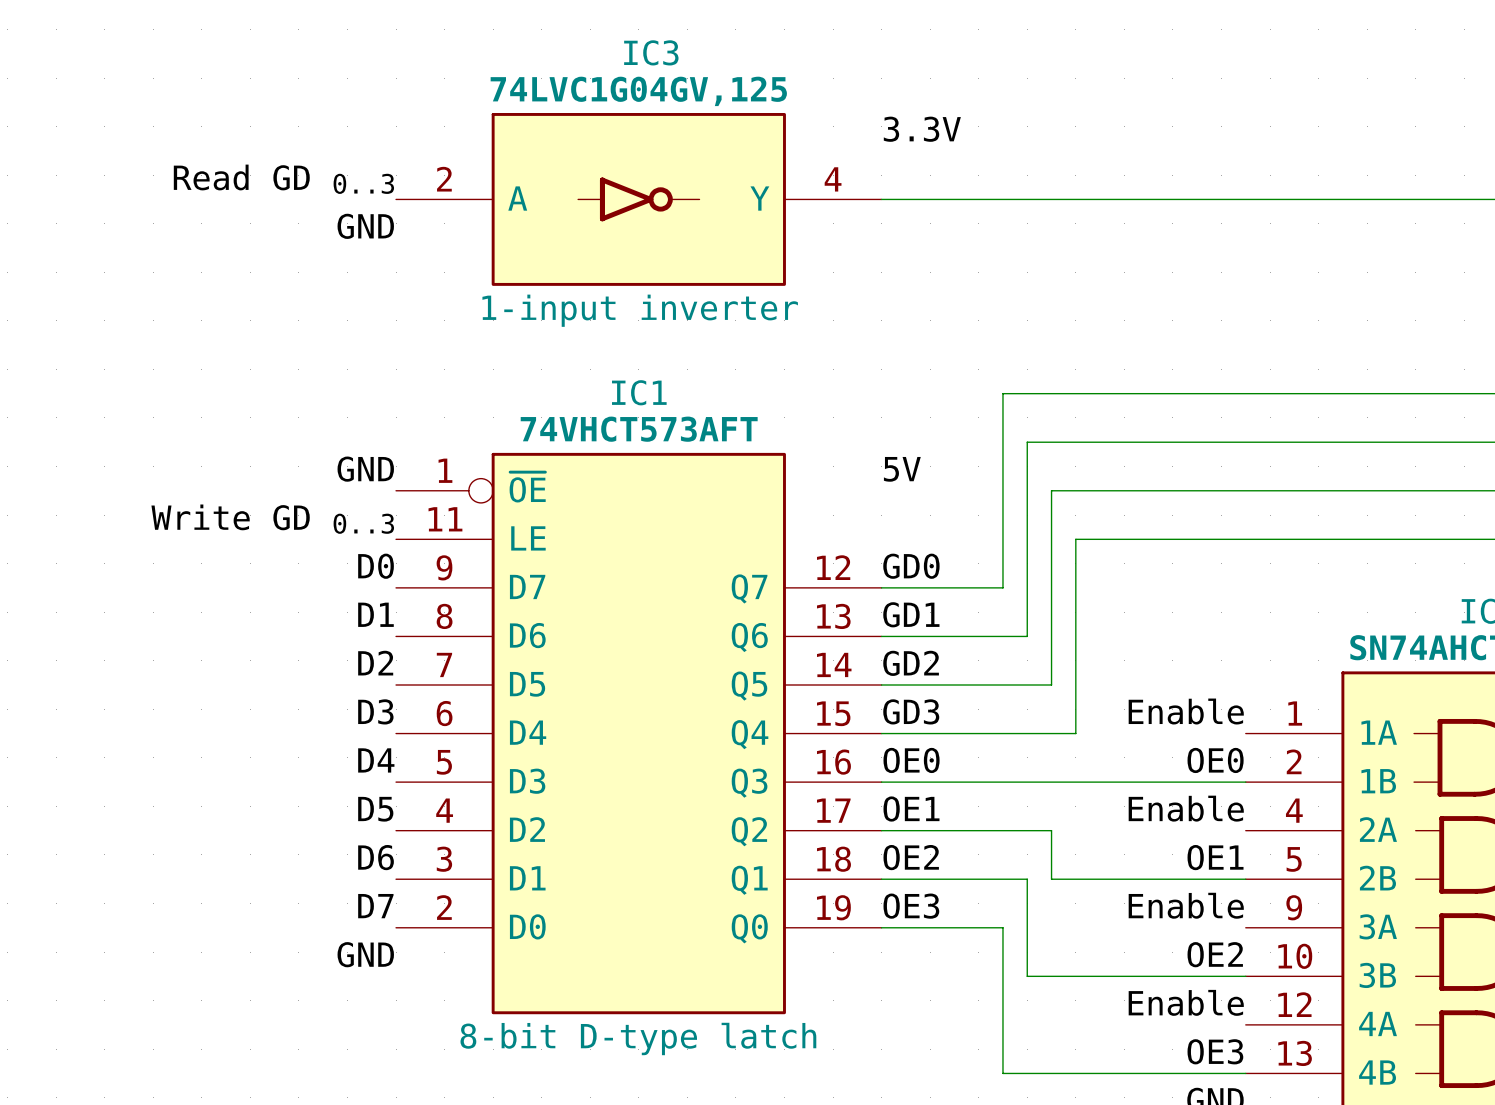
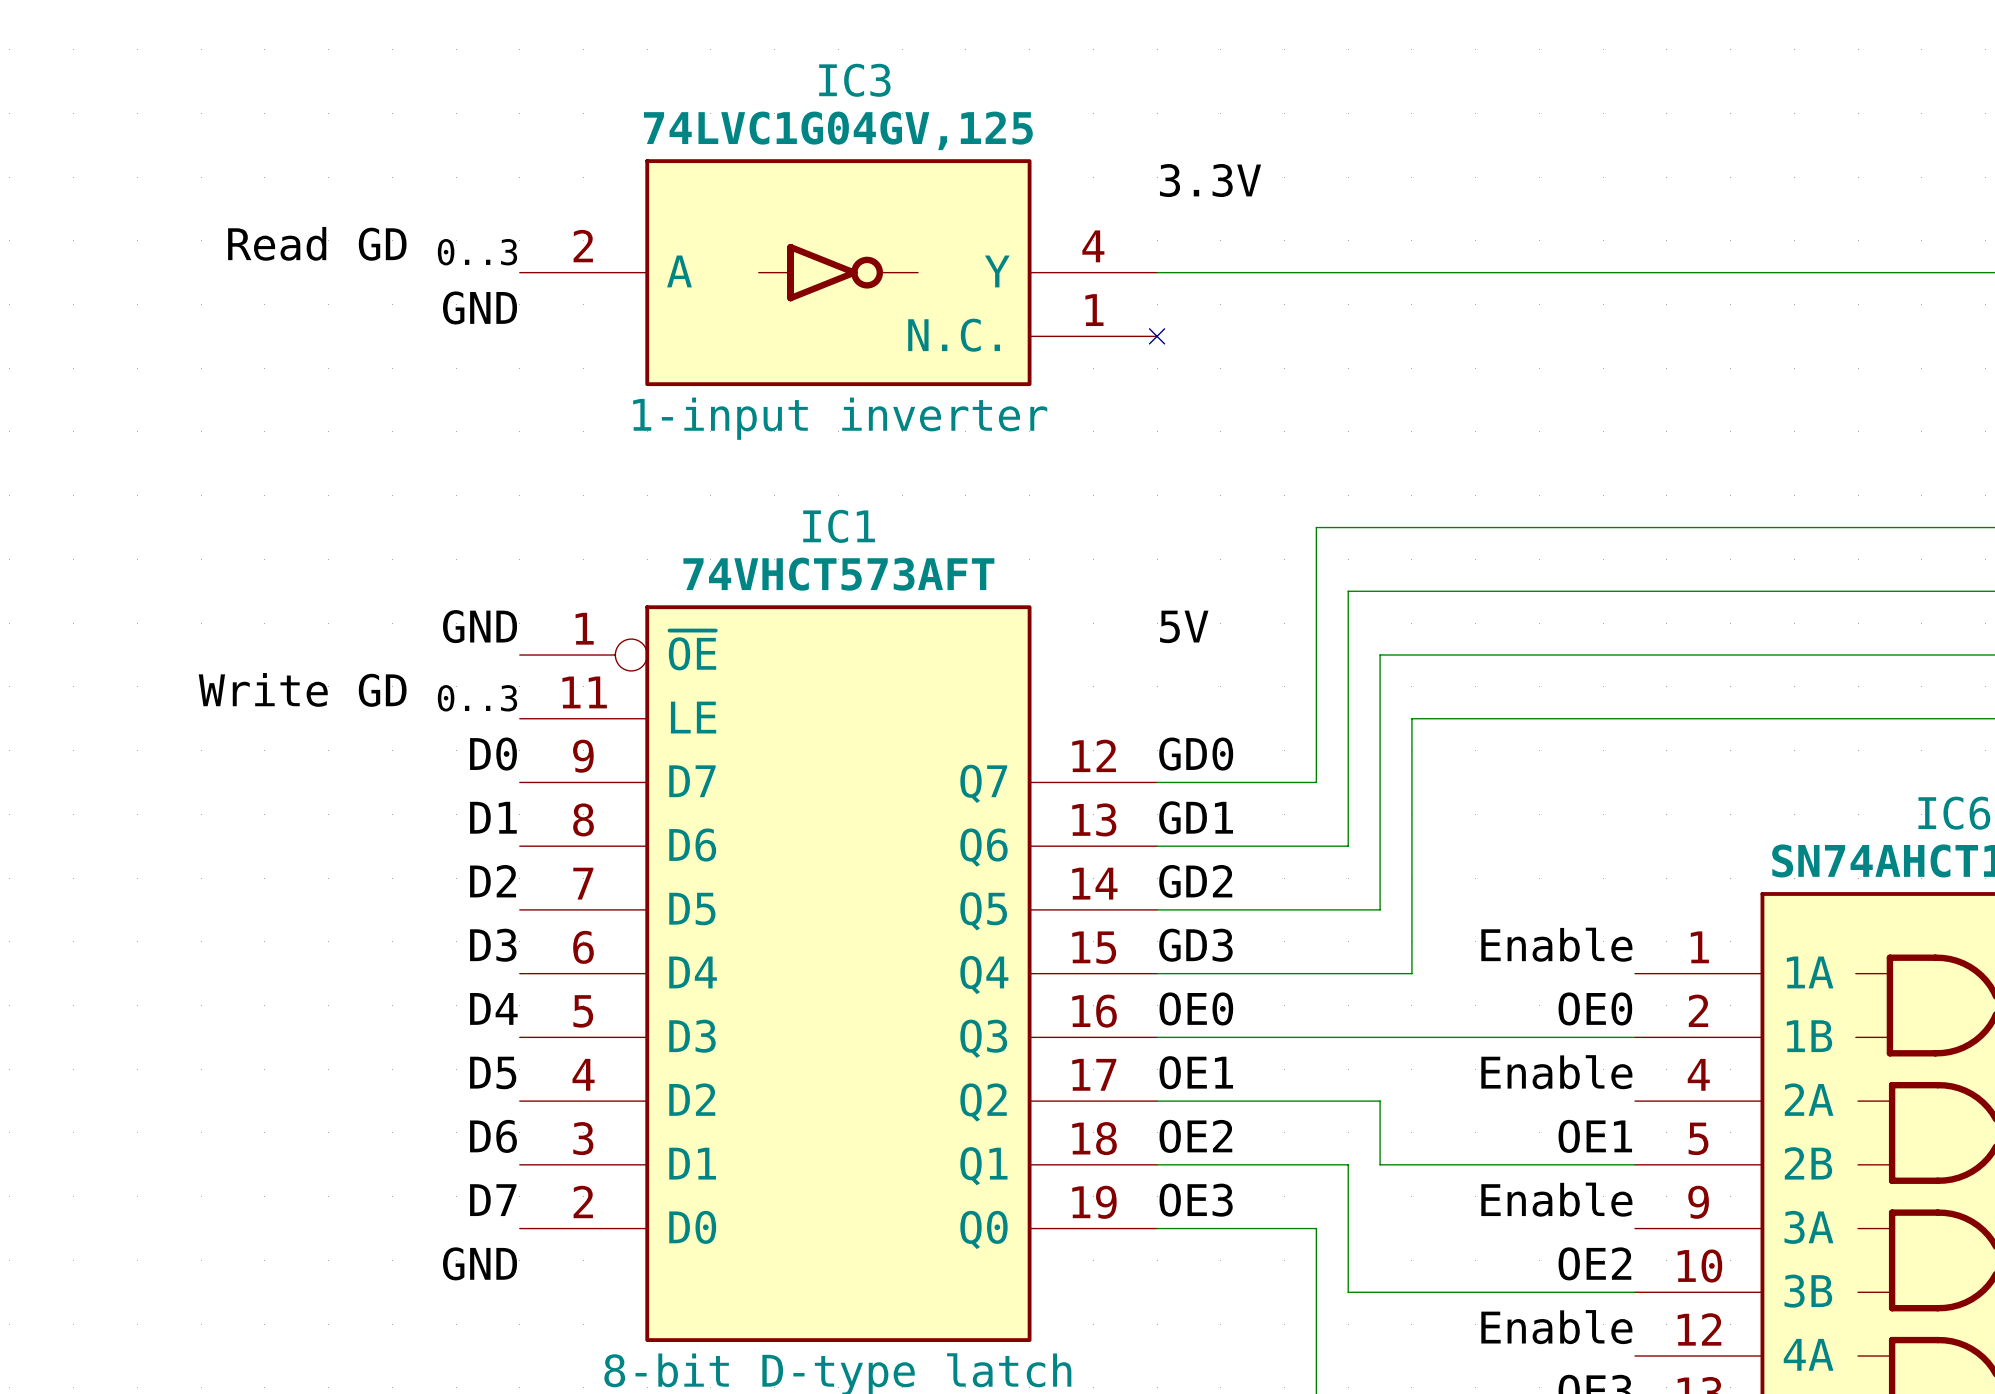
IC3 symbol: [396, 113, 882, 286] -> [519, 159, 1165, 387]

